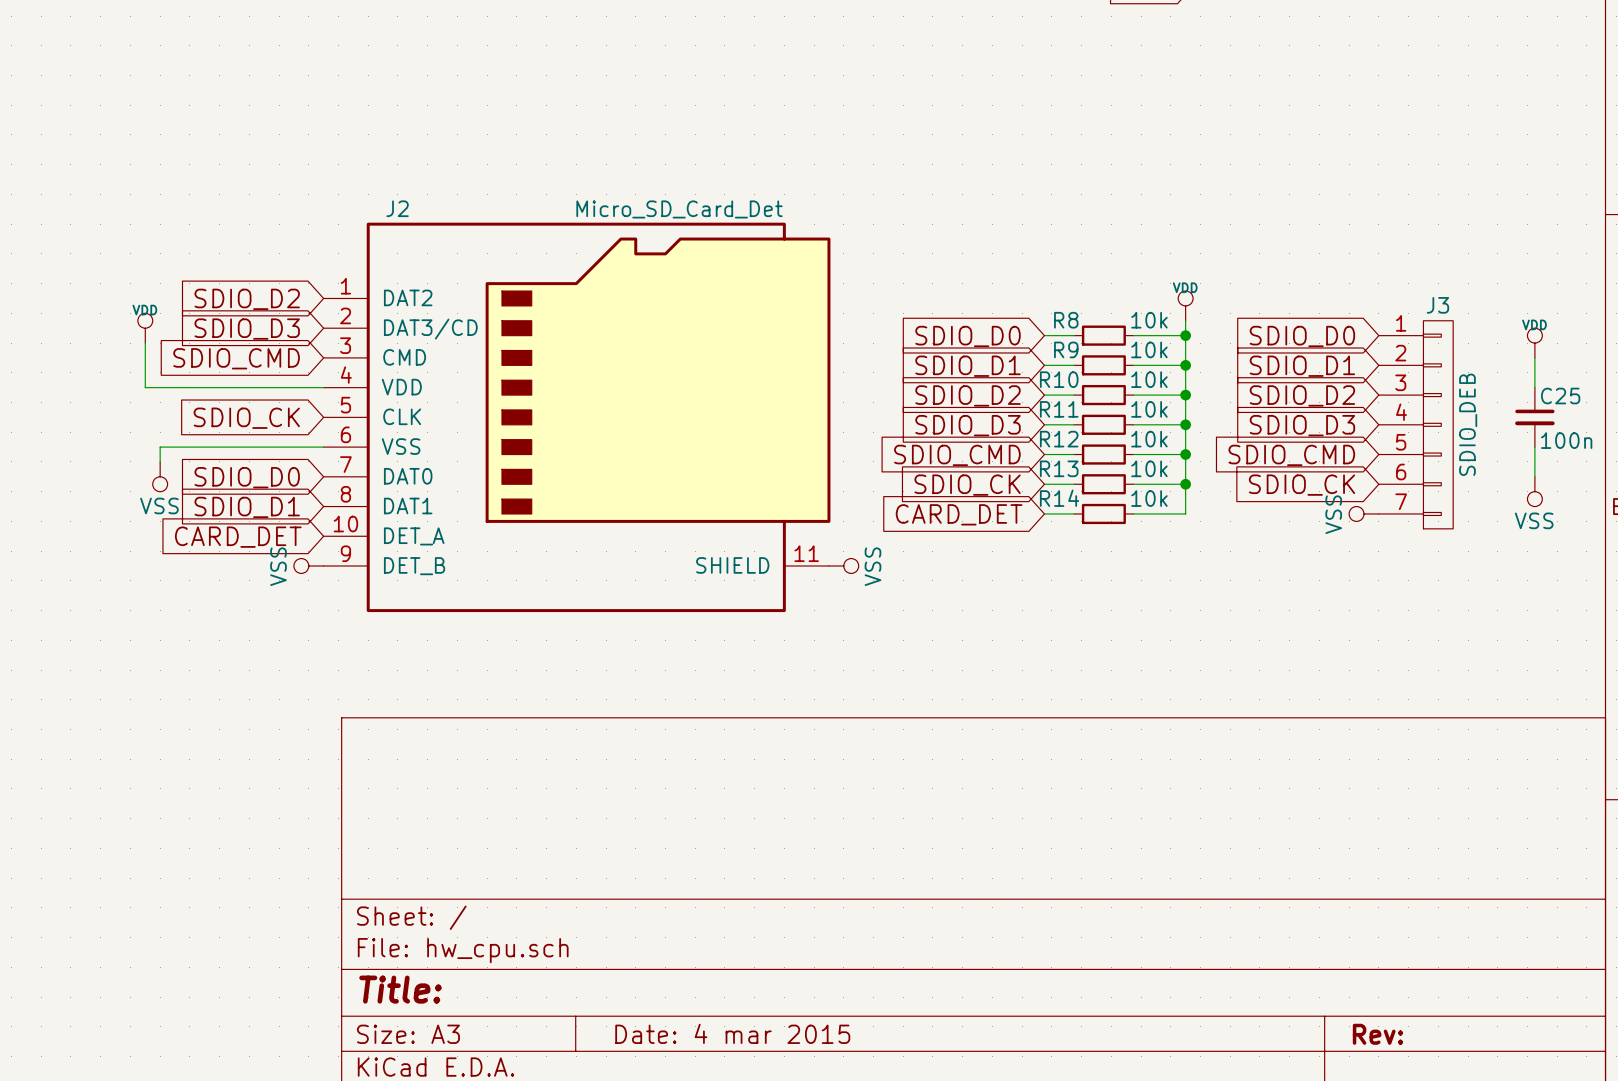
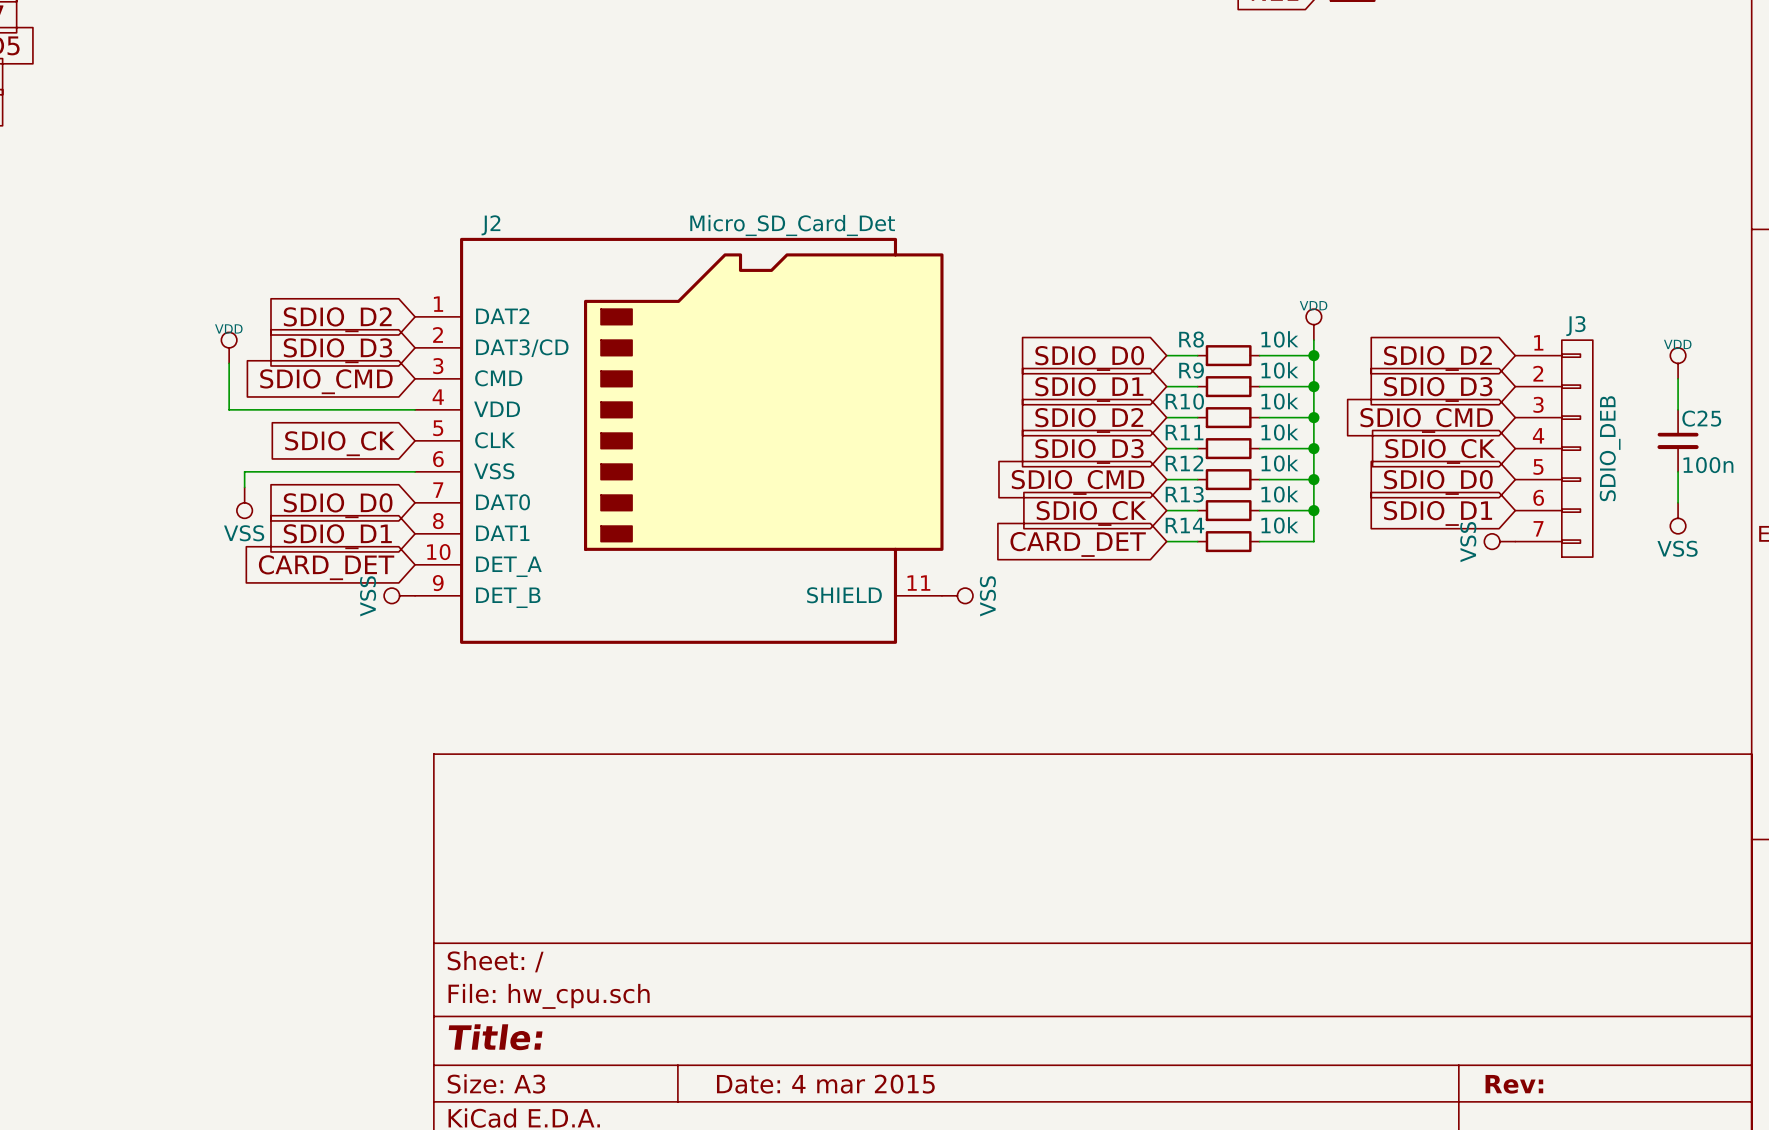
global label: SDIO_D0 (1302, 336) -> SDIO_D2 (1437, 358)
global label: SDIO_D1 (1302, 366) -> SDIO_D3 (1438, 389)
global label: SDIO_D2 (1302, 395) -> SDIO_CMD (1426, 420)
global label: SDIO_D3 (1302, 425) -> SDIO_CK (1440, 451)
global label: SDIO_CMD (1291, 455) -> SDIO_D0 (1438, 482)
global label: SDIO_CK (1301, 485) -> SDIO_D1 (1438, 513)

